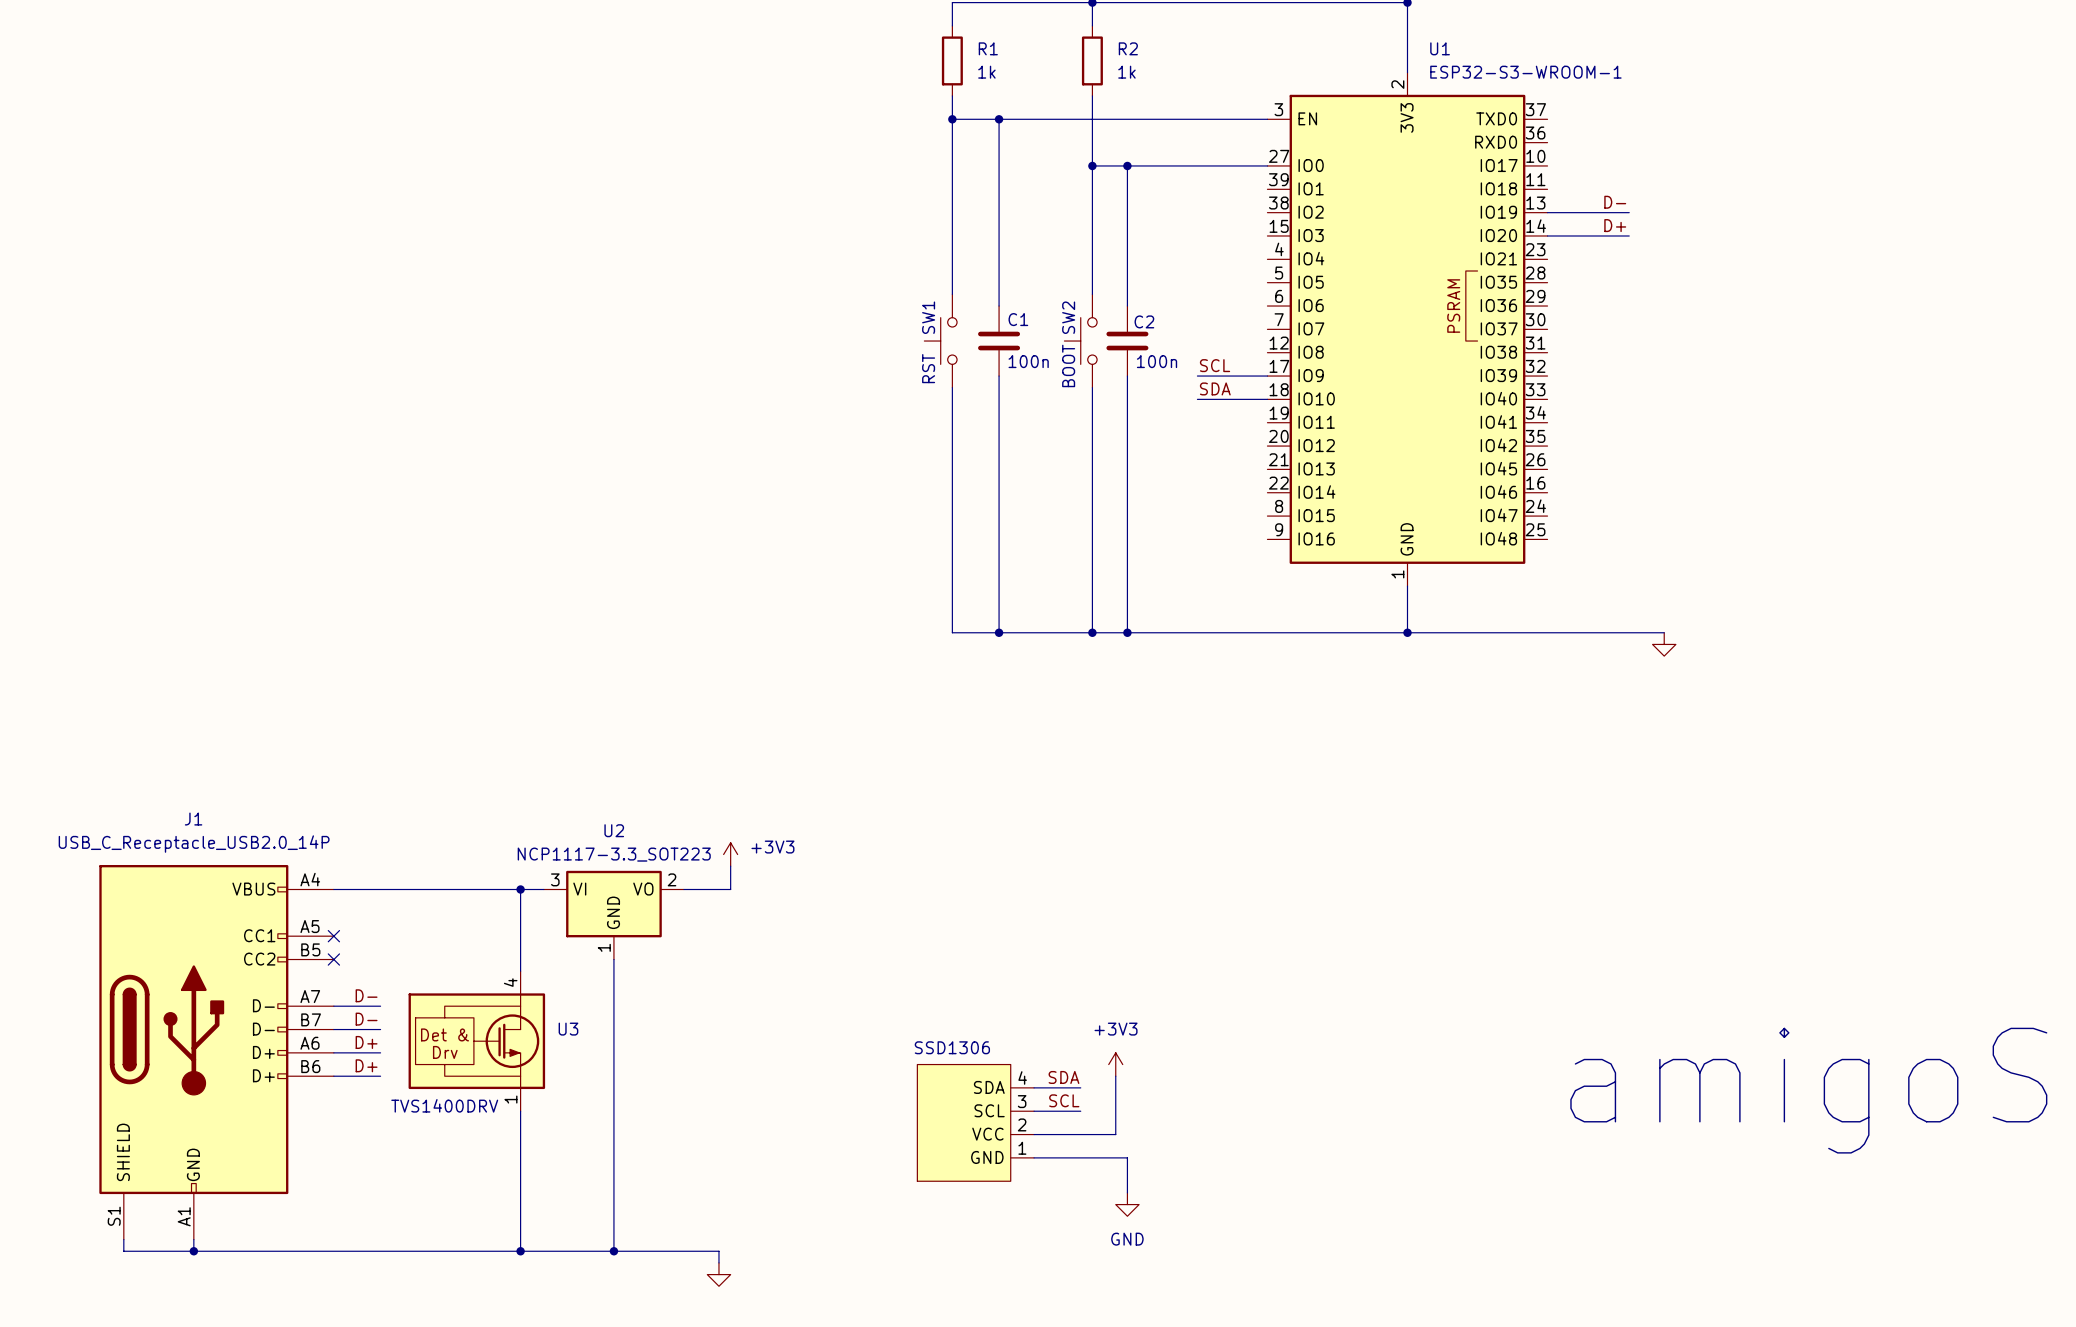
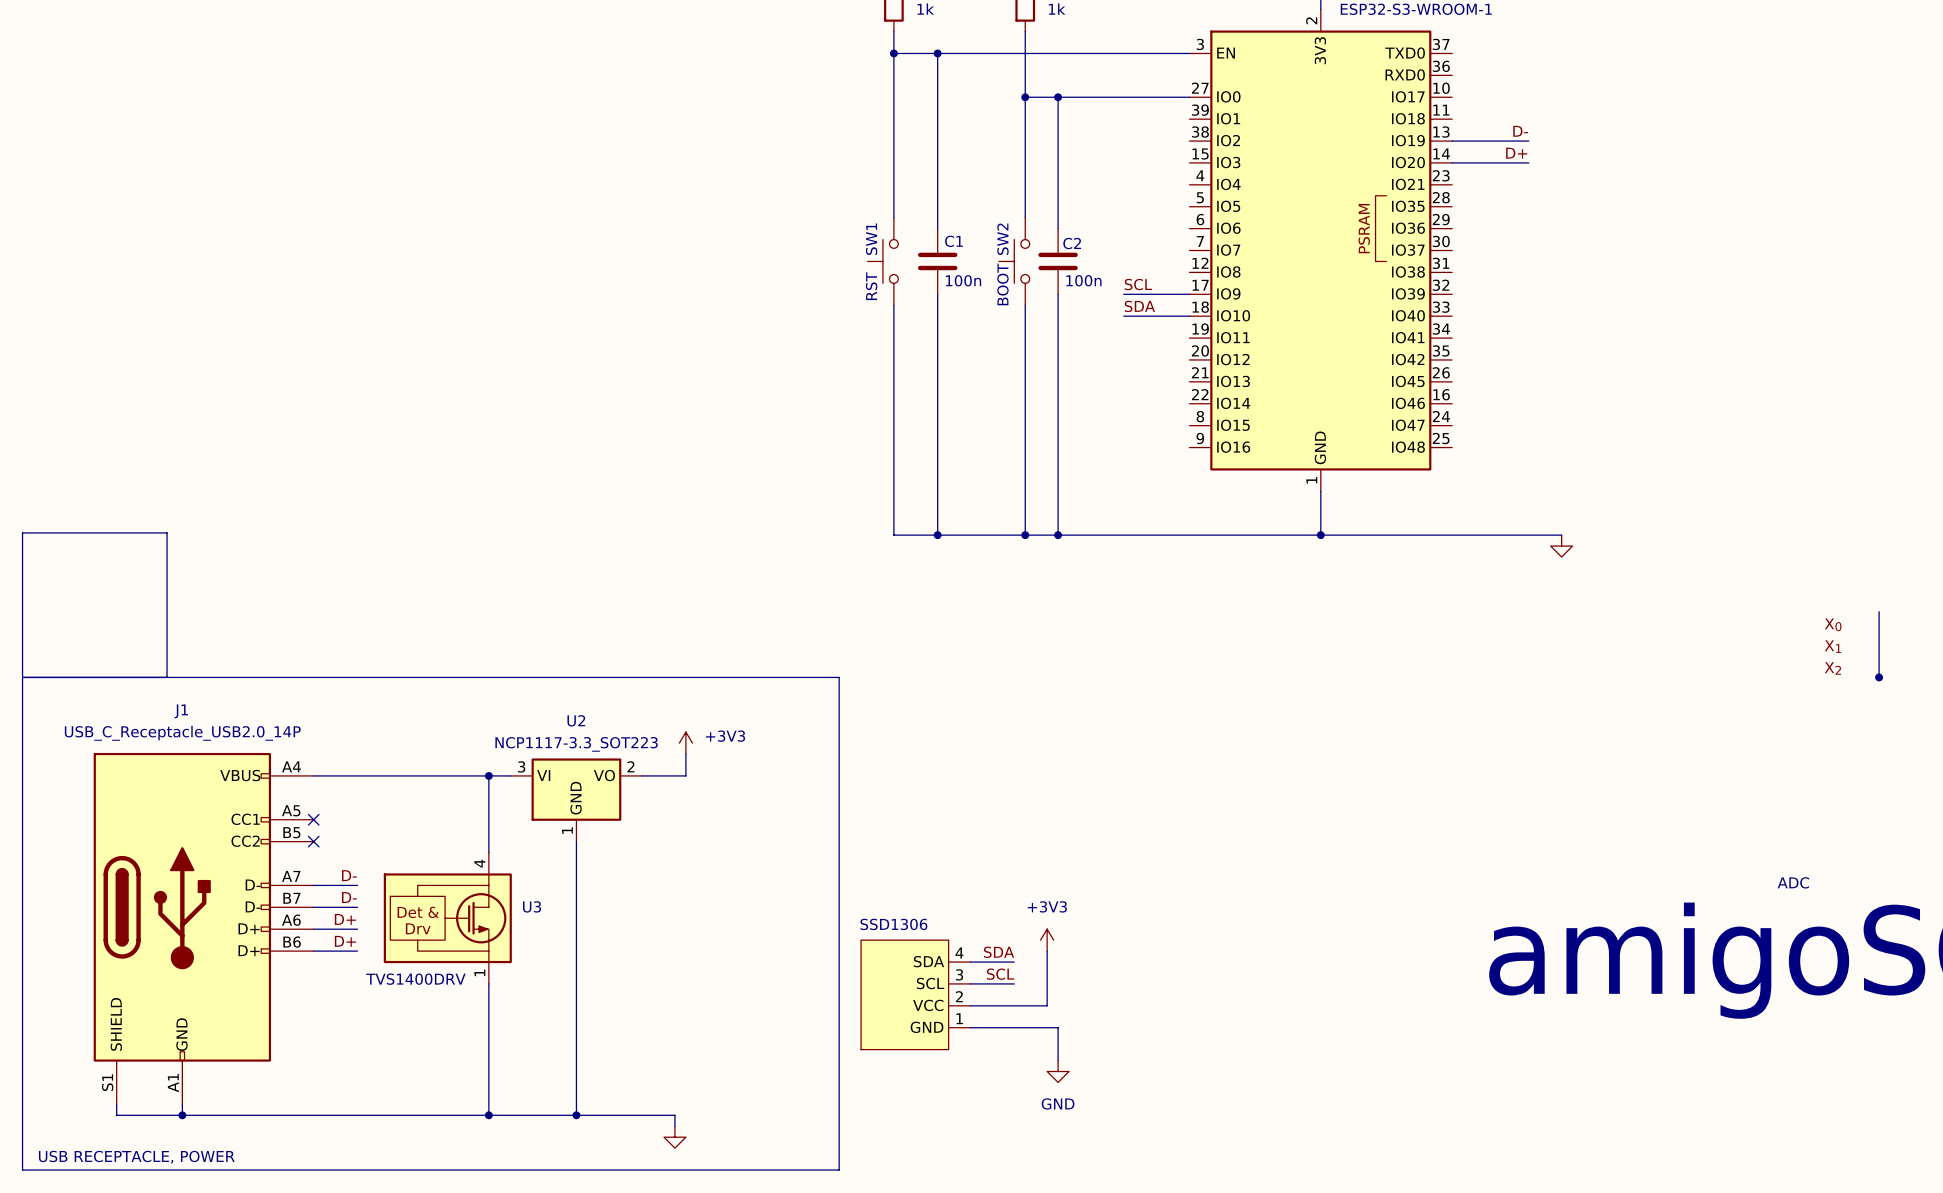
wire: none -> (1879, 611) (1879, 677)
label: none -> X0 (1833, 624)
label: none -> X1 (1832, 646)
label: none -> X2 (1832, 668)
line: none -> (22, 677) (839, 677) (839, 1170) (22, 1170) (22, 532) (167, 532) (167, 677)
junction: none -> (1879, 677)
text: none -> ADC (1793, 882)
text: none -> USB RECEPTACLE, POWER (136, 1157)

